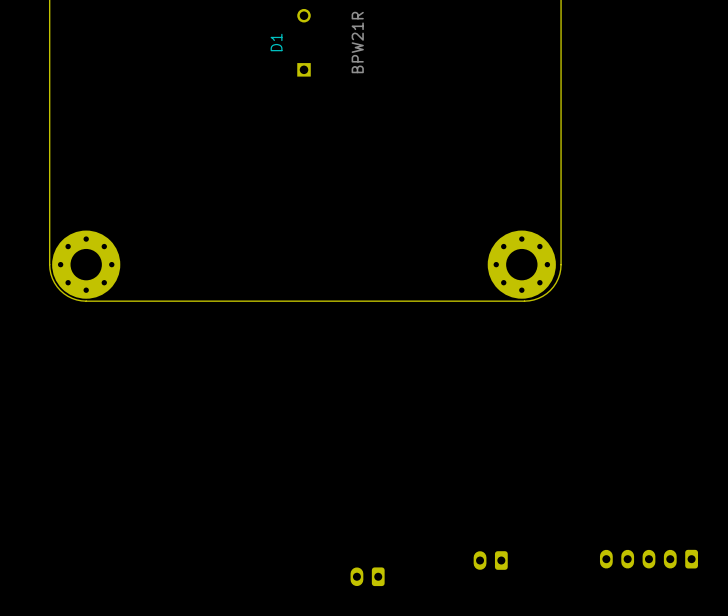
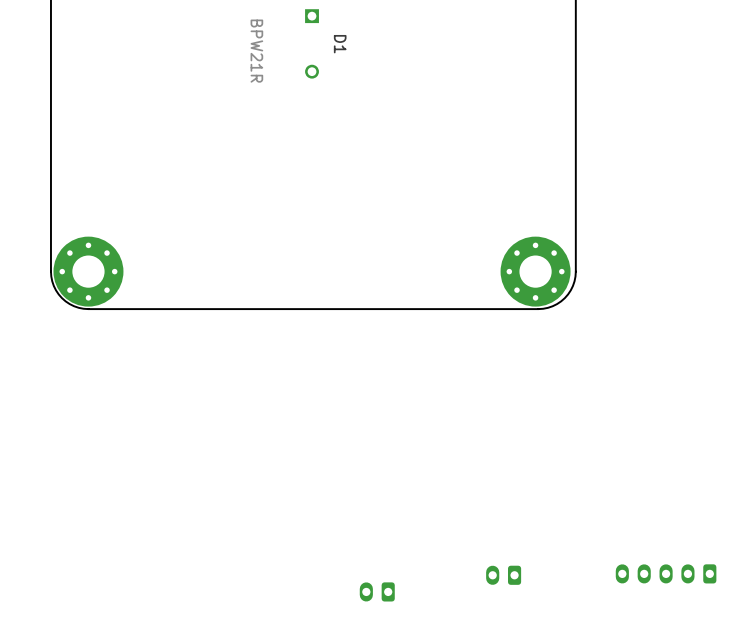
D1 rotation: 0° (304, 42) -> 180° (312, 43)

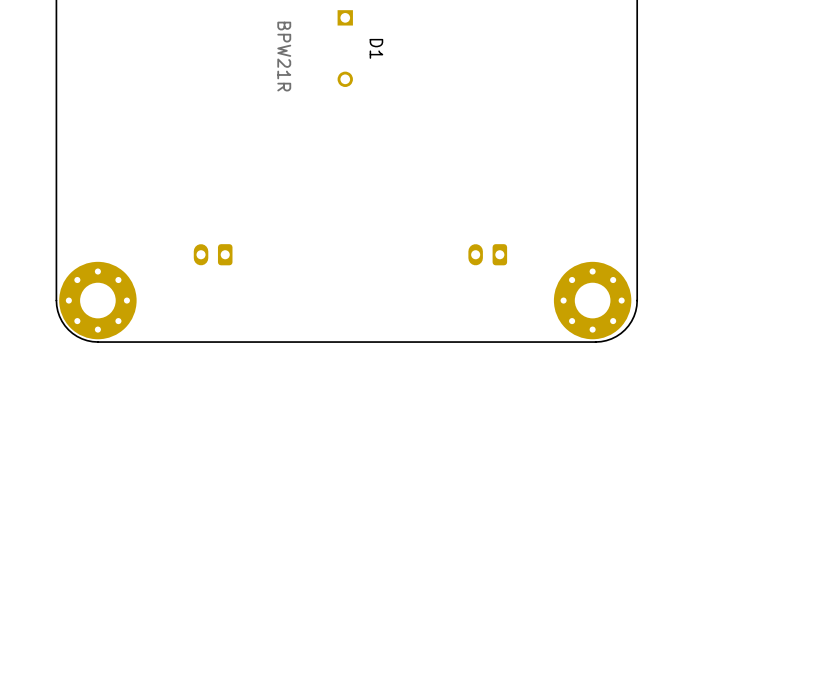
part: none -> (213, 254)
part: none -> (487, 254)
part: (666, 573) -> none
part: (503, 575) -> none
part: (377, 591) -> none

